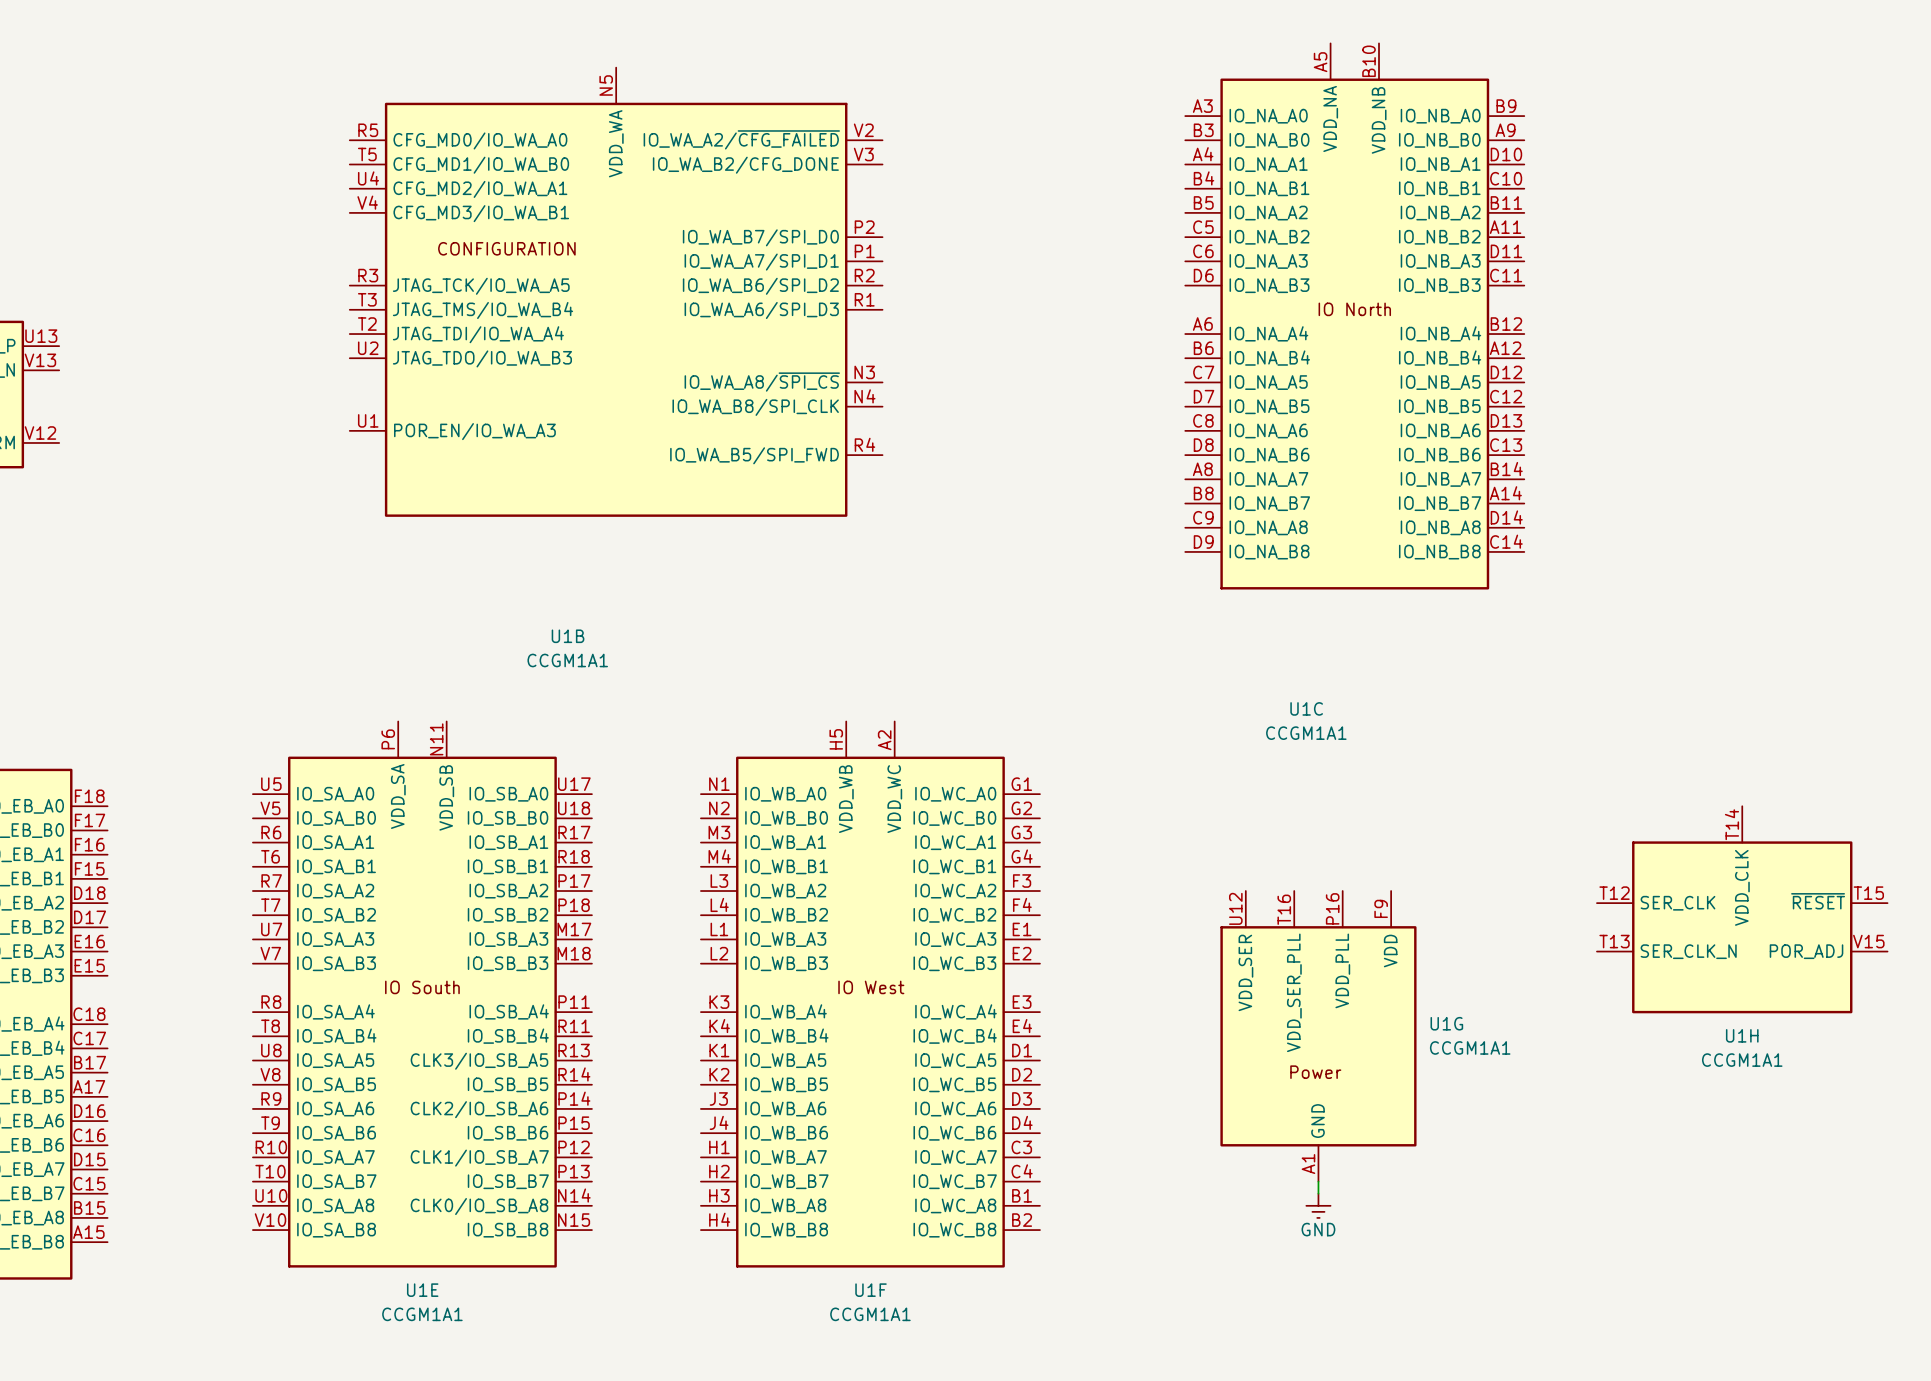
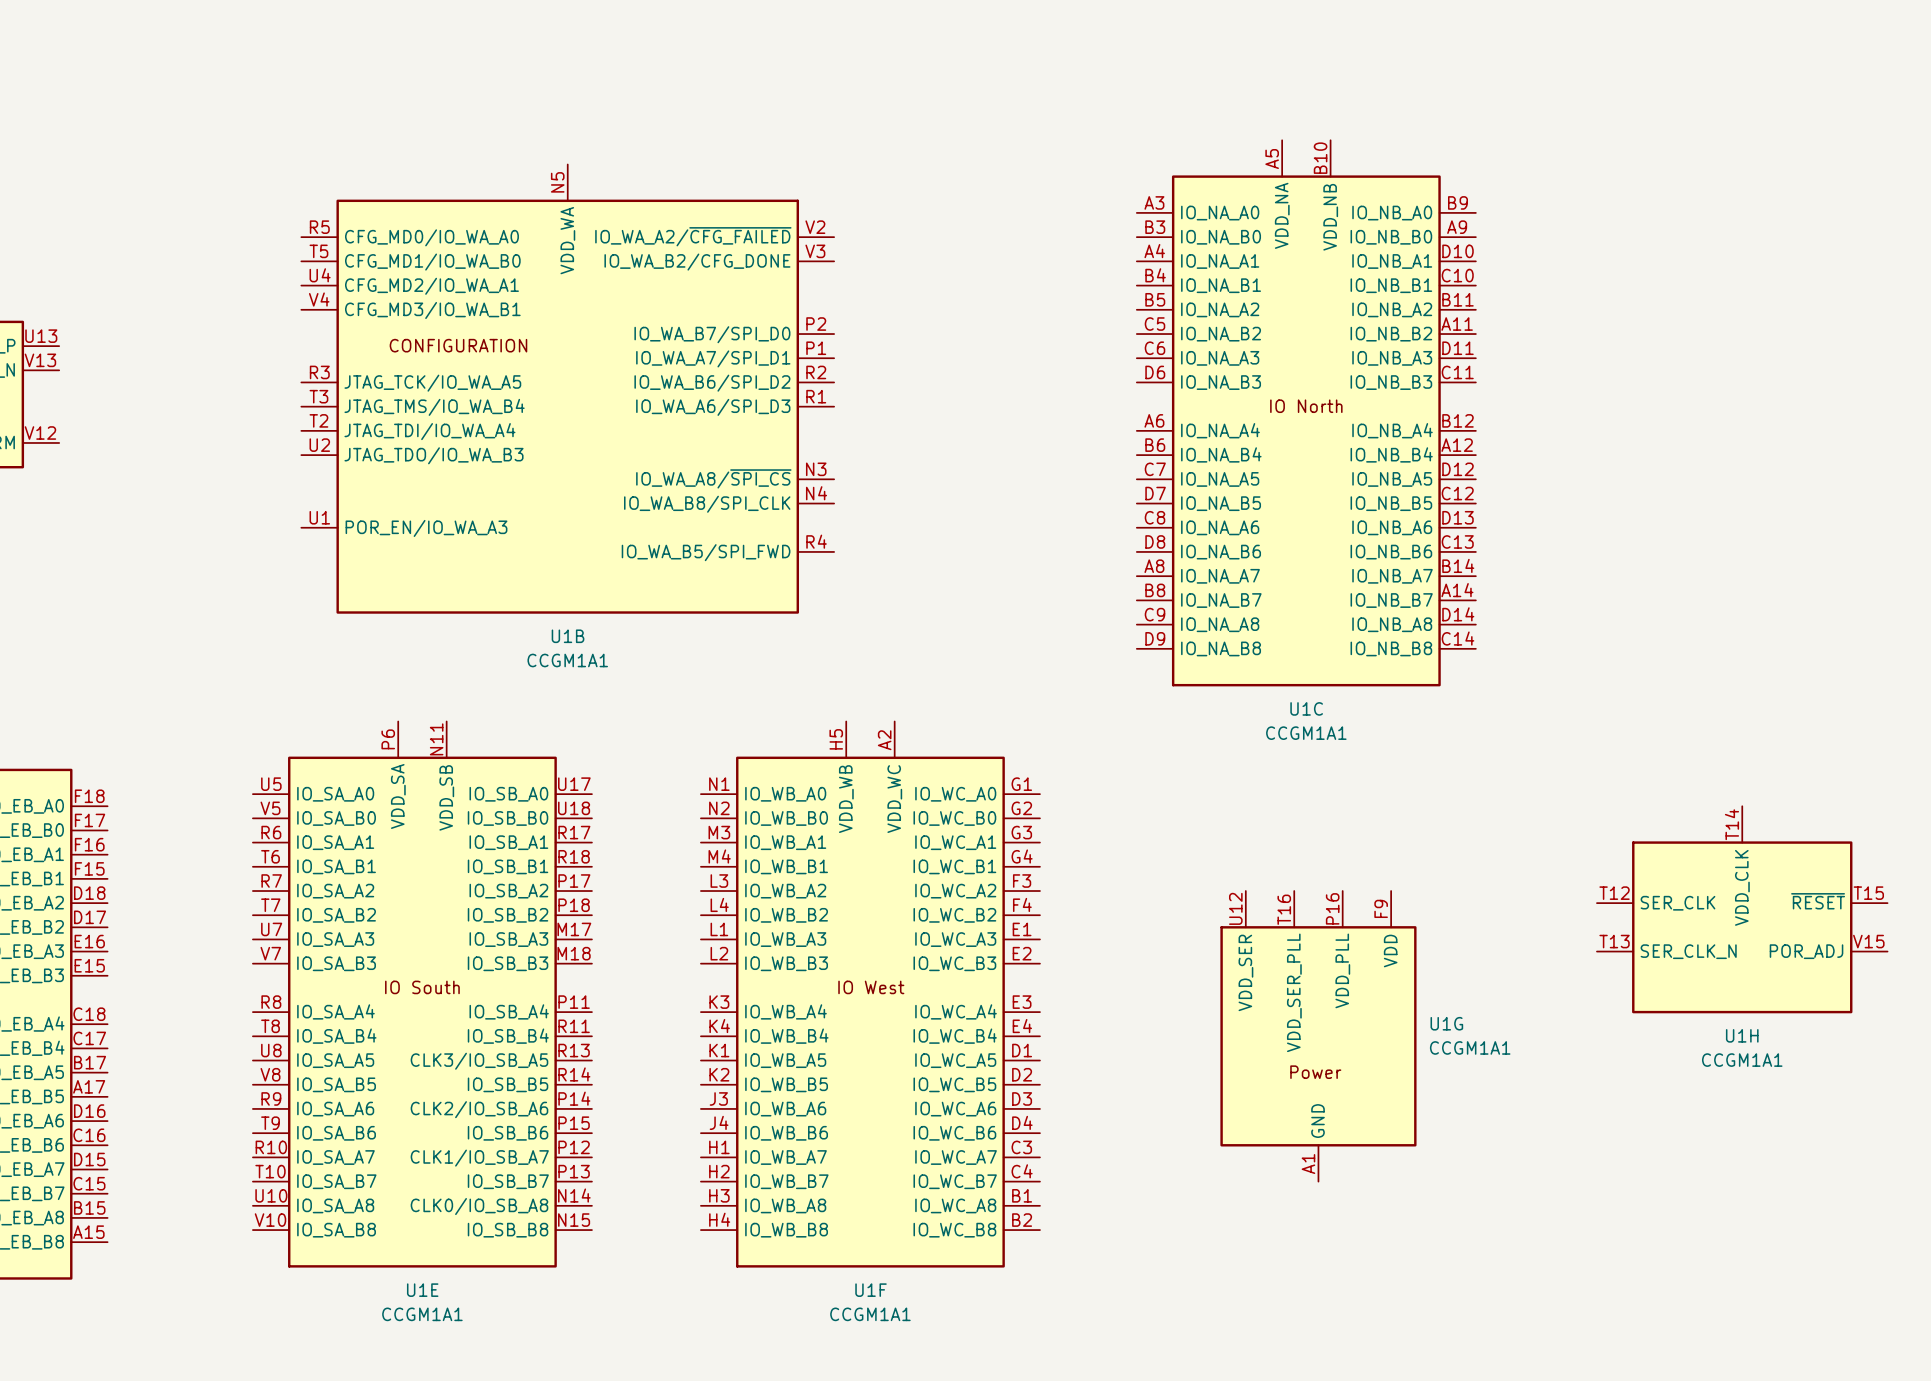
U1B position: (616, 292) -> (567, 389)
U1C position: (1354, 316) -> (1306, 413)
wire: (1318, 1181) (1318, 1193) -> none
power symbol: GND (1318, 1205) -> none

